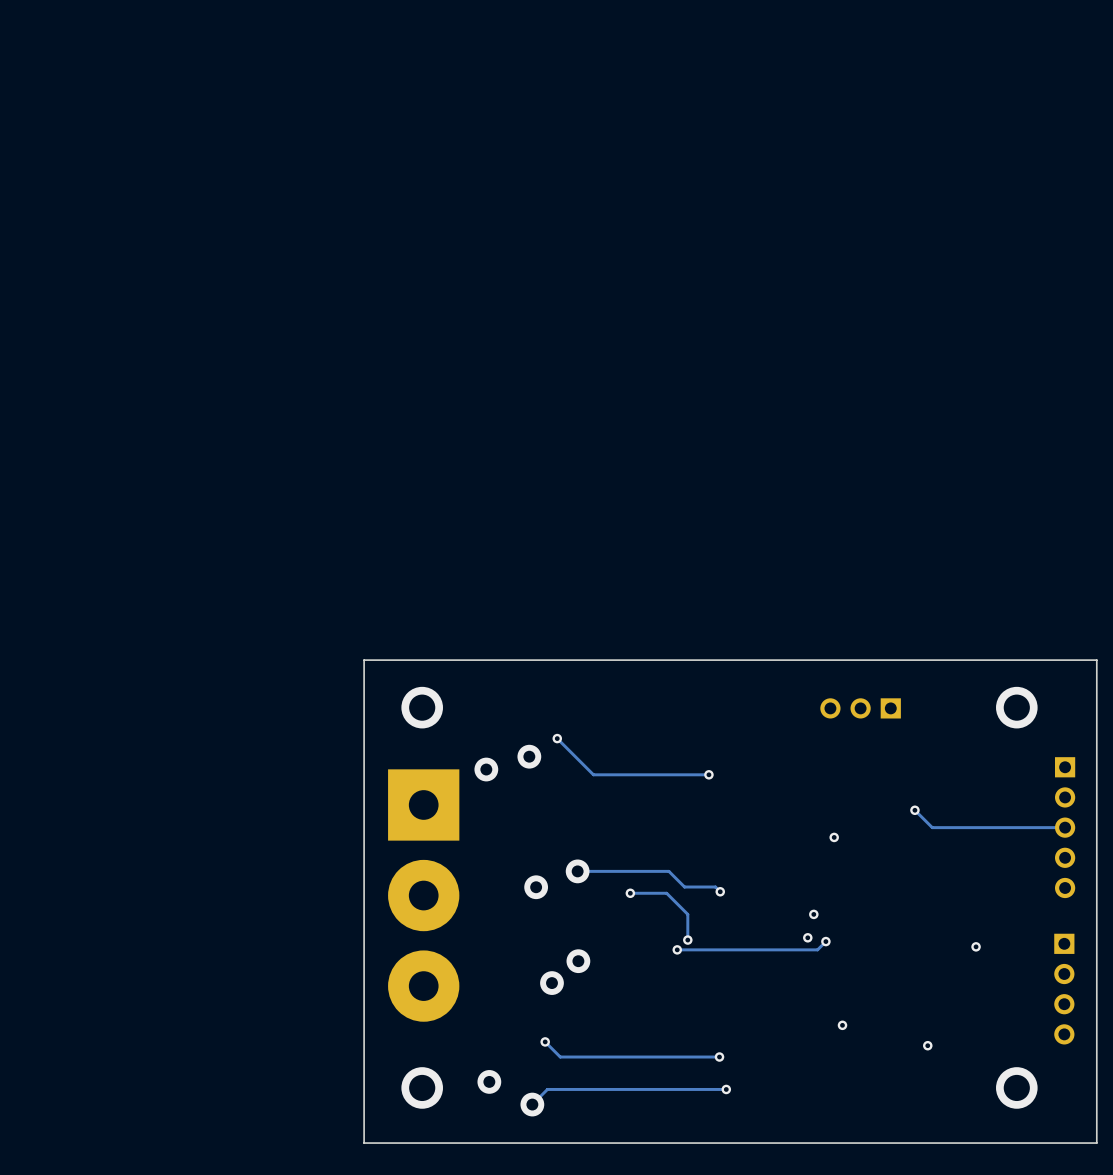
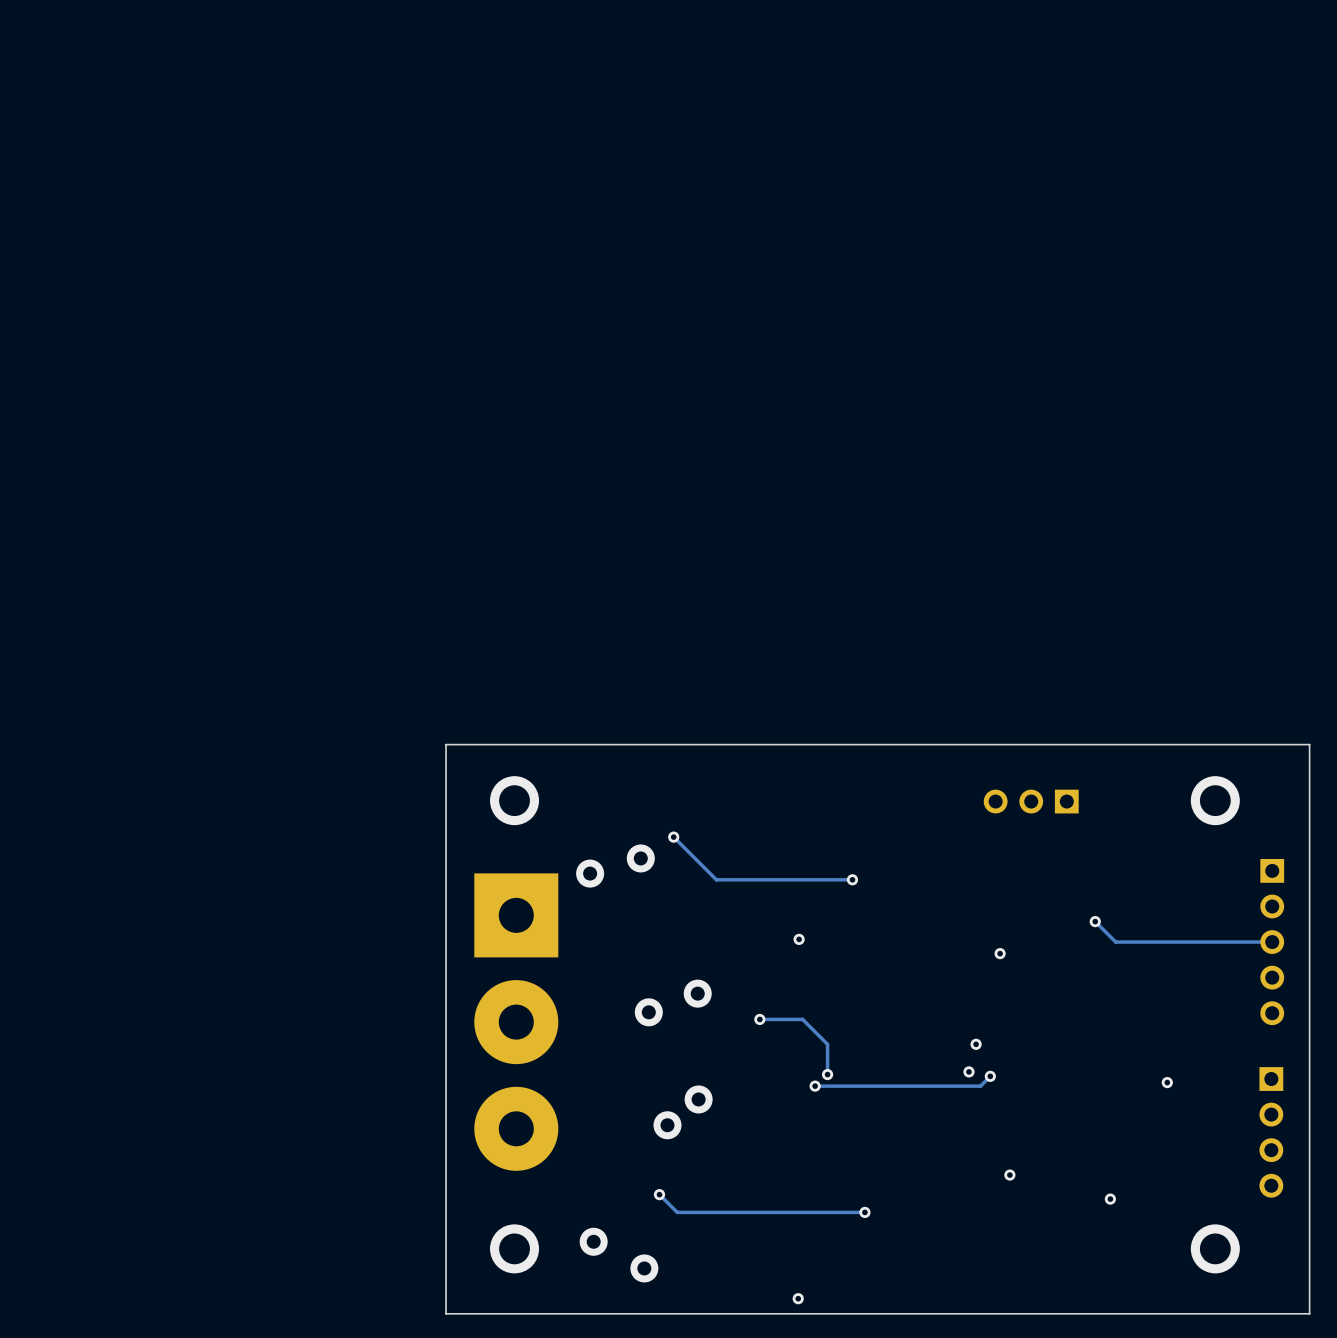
via: none -> (799, 939)
track: (577, 871) (668, 871) (684, 887) (715, 887) (720, 891) -> none
via: (720, 891) -> none
track: (726, 1089) (547, 1089) (532, 1104) -> none
via: (726, 1089) -> none
via: none -> (798, 1298)

